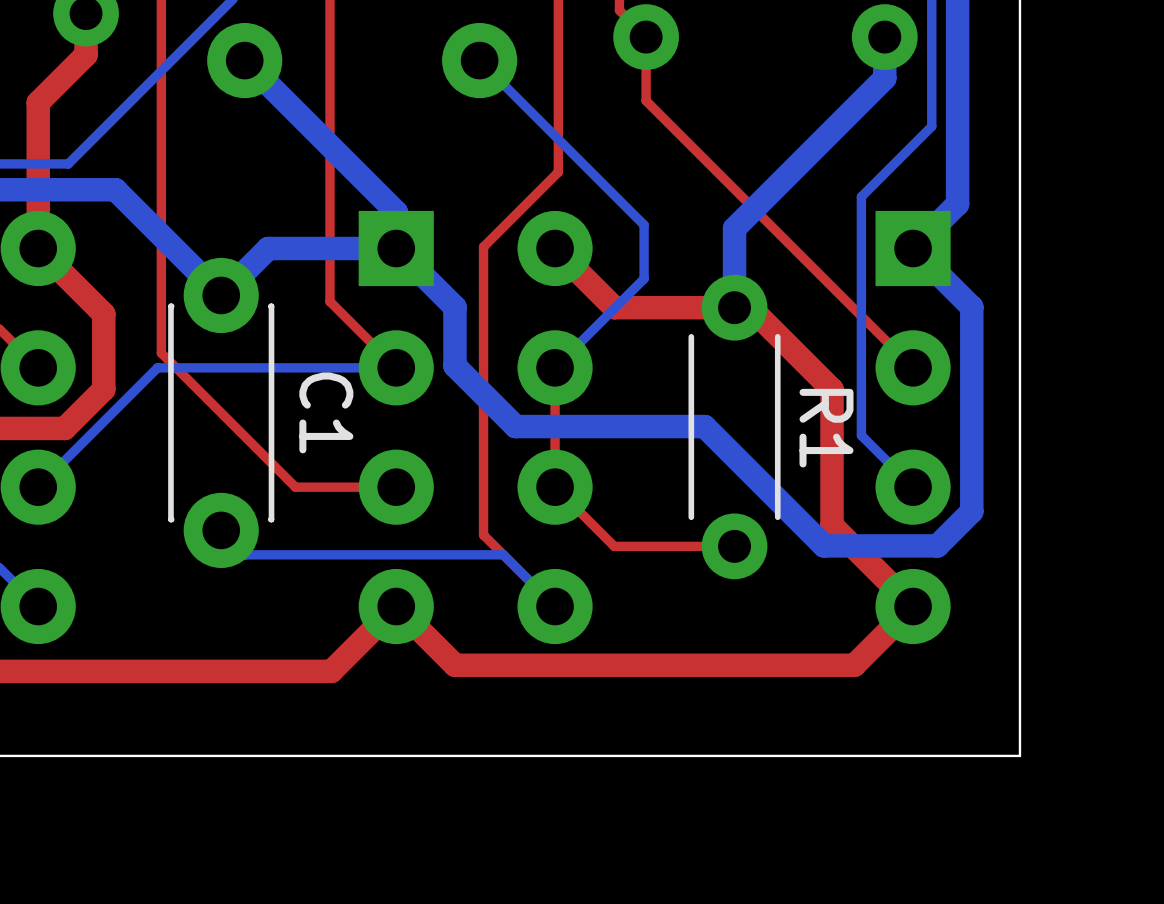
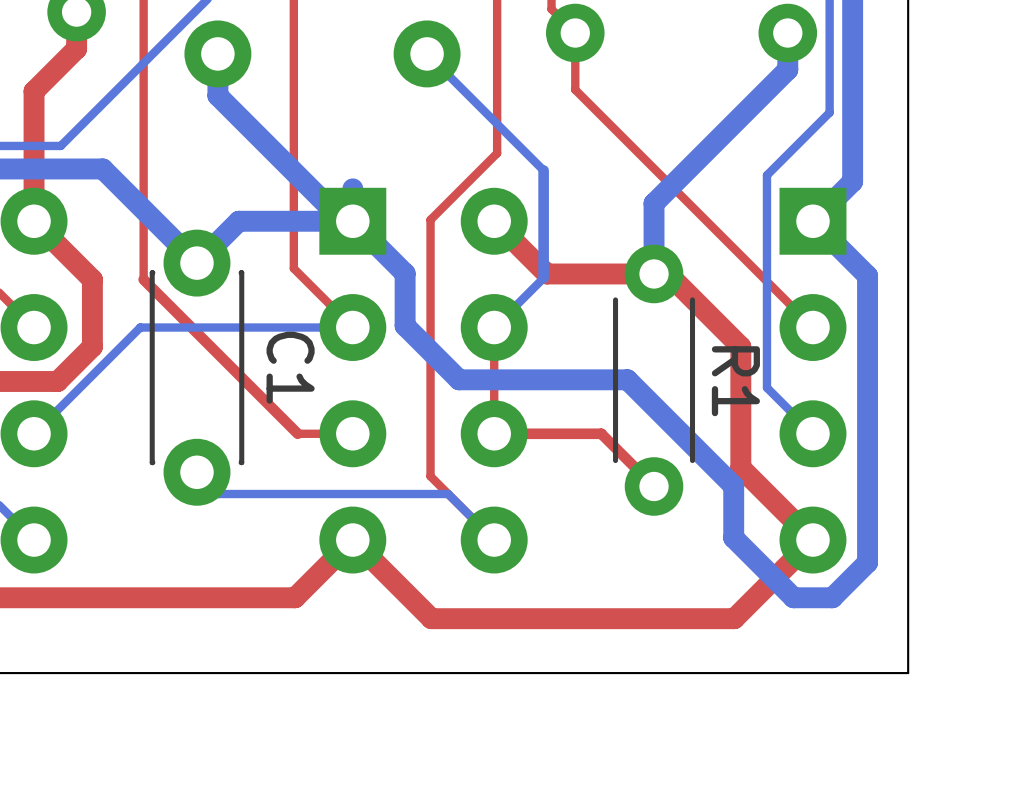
bottom track: (244, 60) (396, 212) -> (217, 53) (217, 95) (343, 221)
bottom track: (610, 191) (644, 225) (644, 278) (610, 312) -> (543, 170) (543, 278)
bottom track: (971, 307) (971, 511) (937, 545) (824, 545) -> (865, 273) (867, 275) (867, 562) (832, 597) (793, 597) (733, 537) (733, 486)
top track: (161, 314) (161, 353) (295, 487) (334, 487) -> (143, 279) (297, 433)
top track: (555, 487) (614, 546) (734, 546) -> (494, 433) (601, 433) (654, 486)
top track: (854, 665) (454, 665) -> (760, 592) (734, 618) (431, 618) (405, 592)

